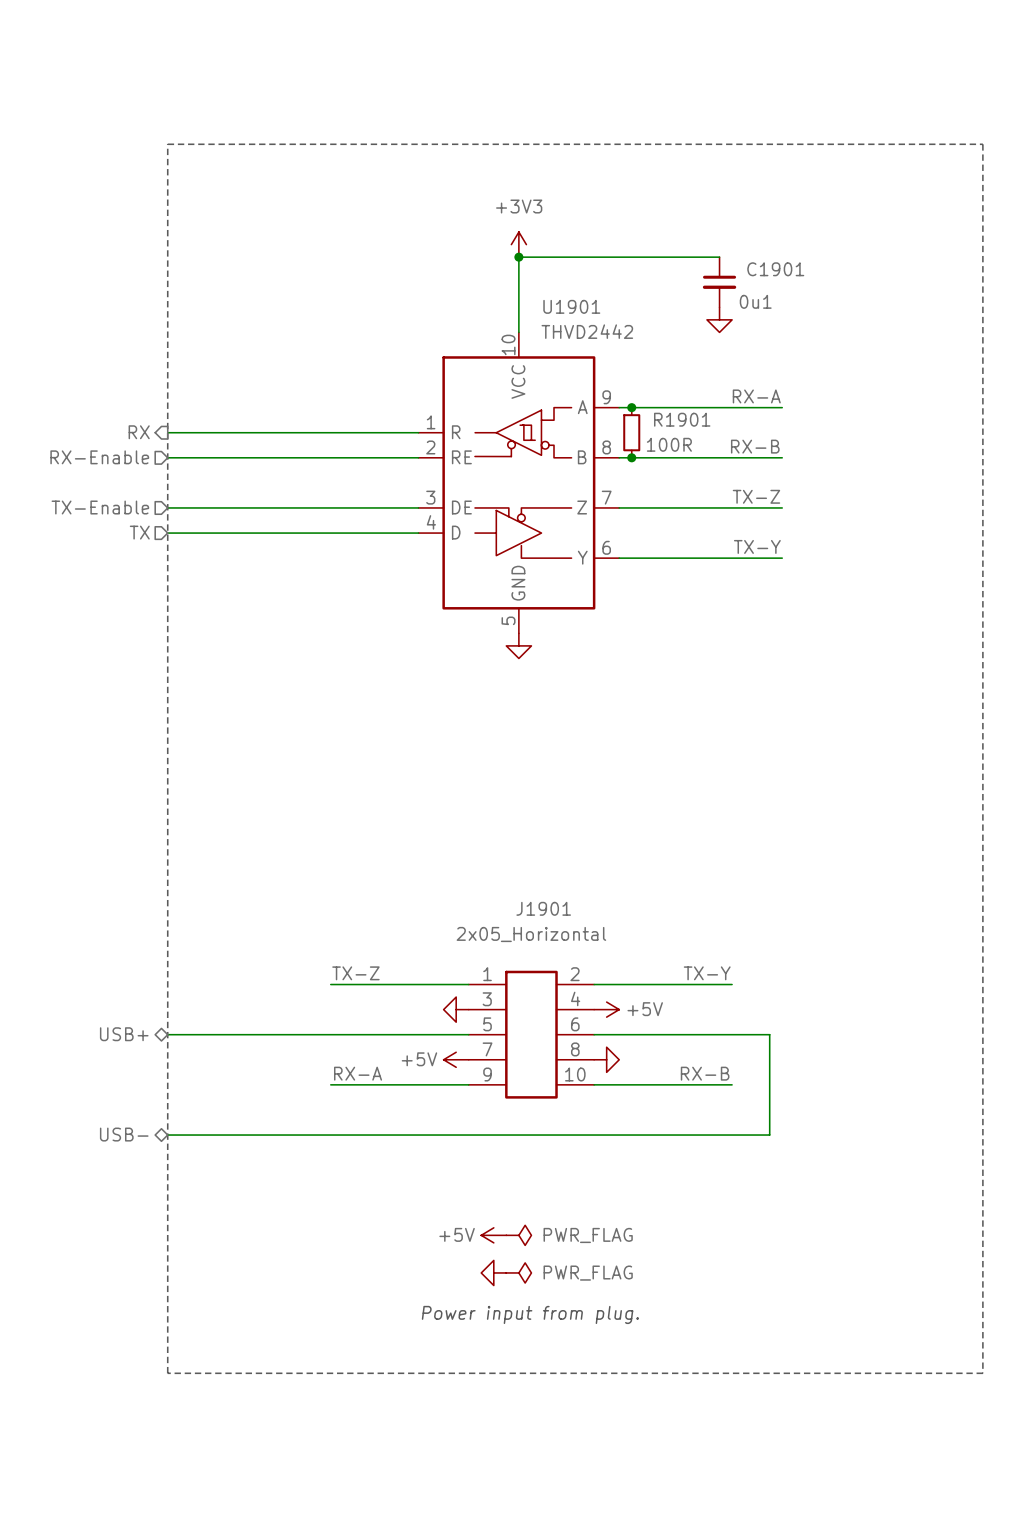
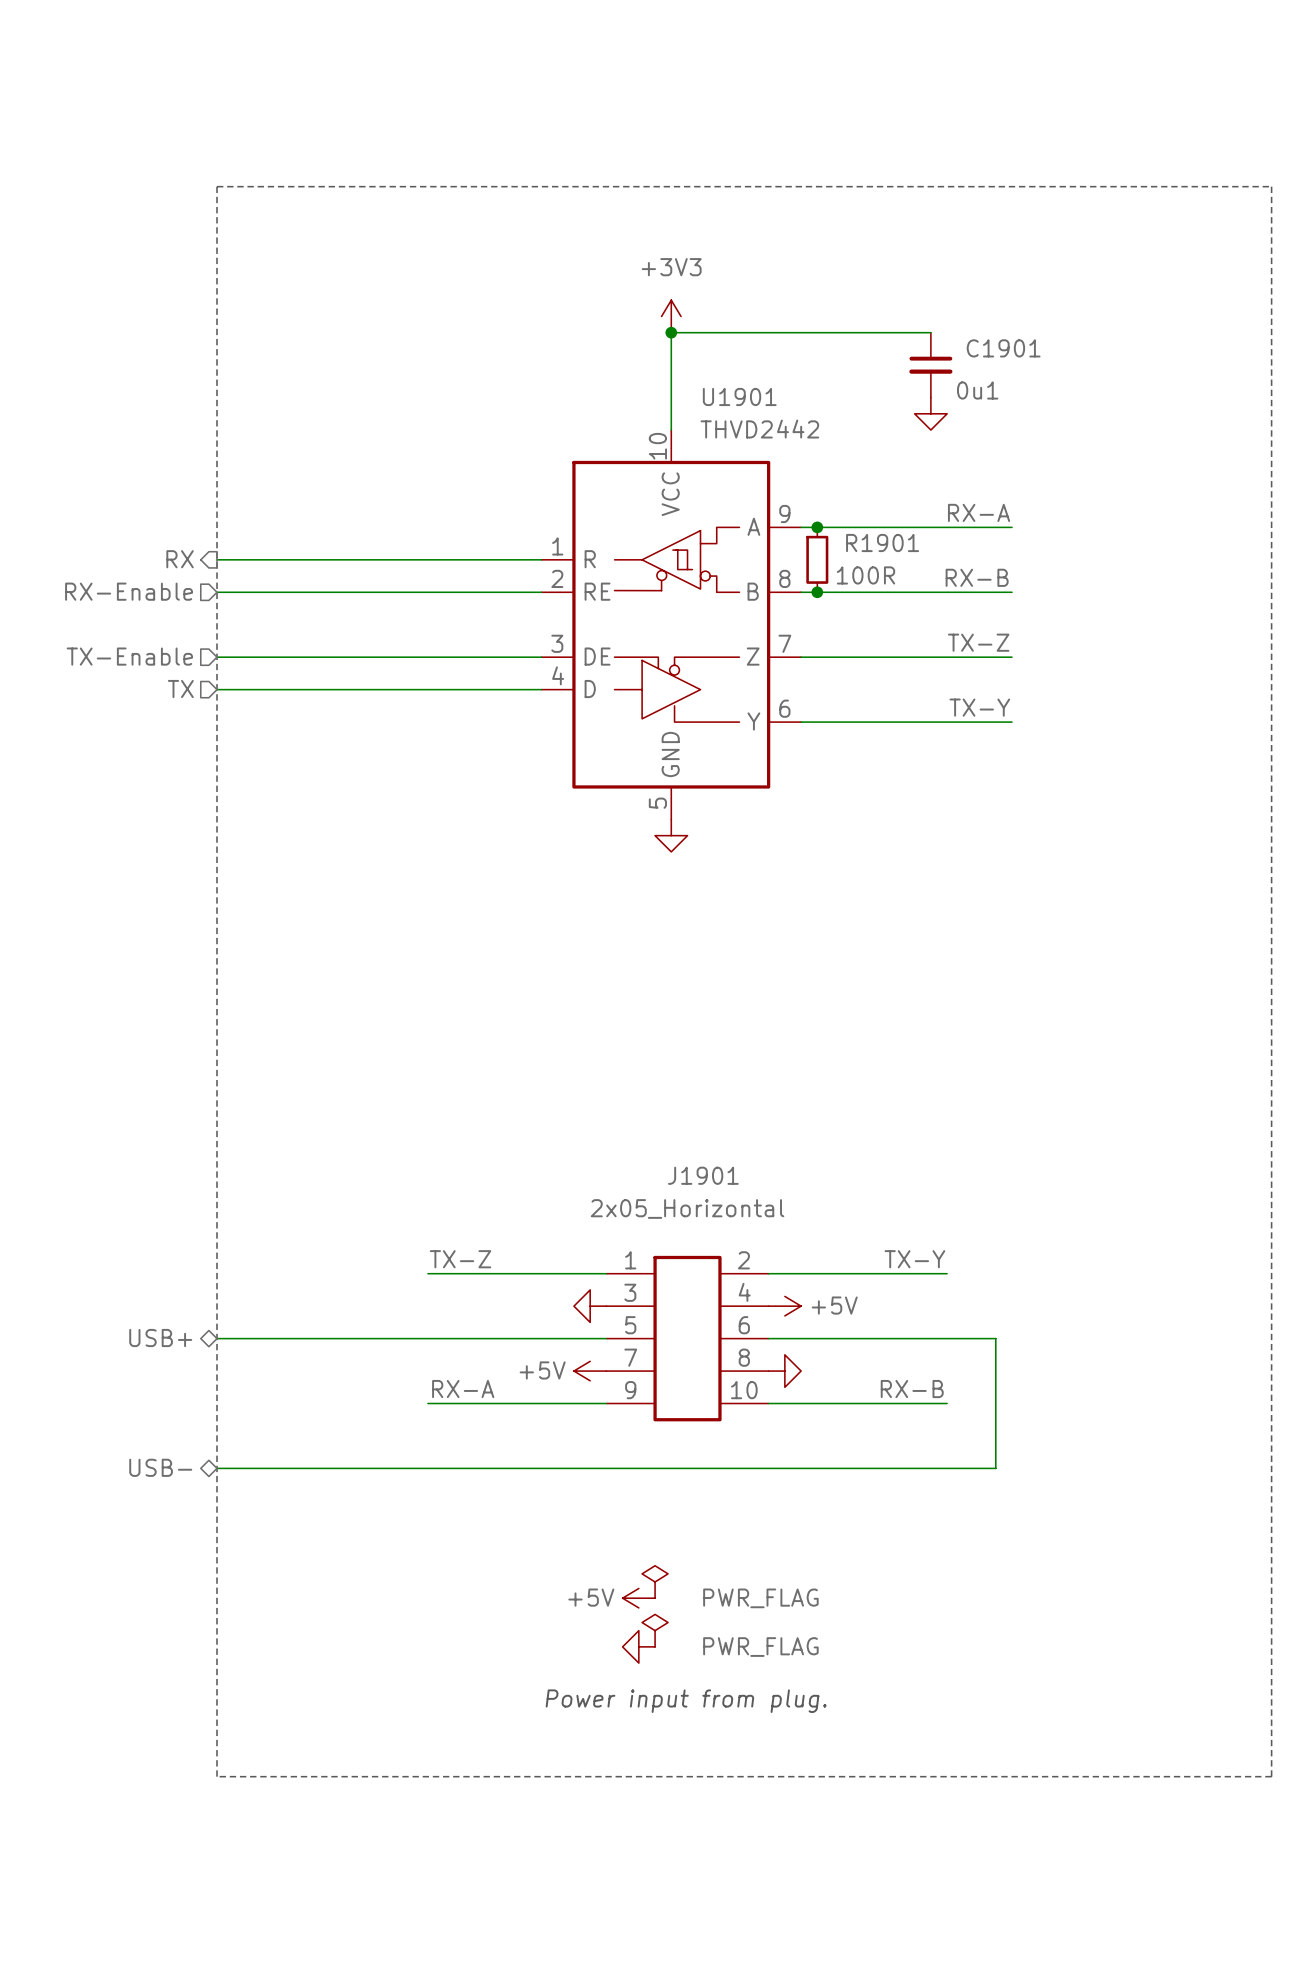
power symbol: none -> PWR_FLAG (655, 1581)
power symbol: PWR_FLAG (518, 1235) -> none
power symbol: none -> PWR_FLAG (655, 1630)
power symbol: PWR_FLAG (518, 1272) -> none

